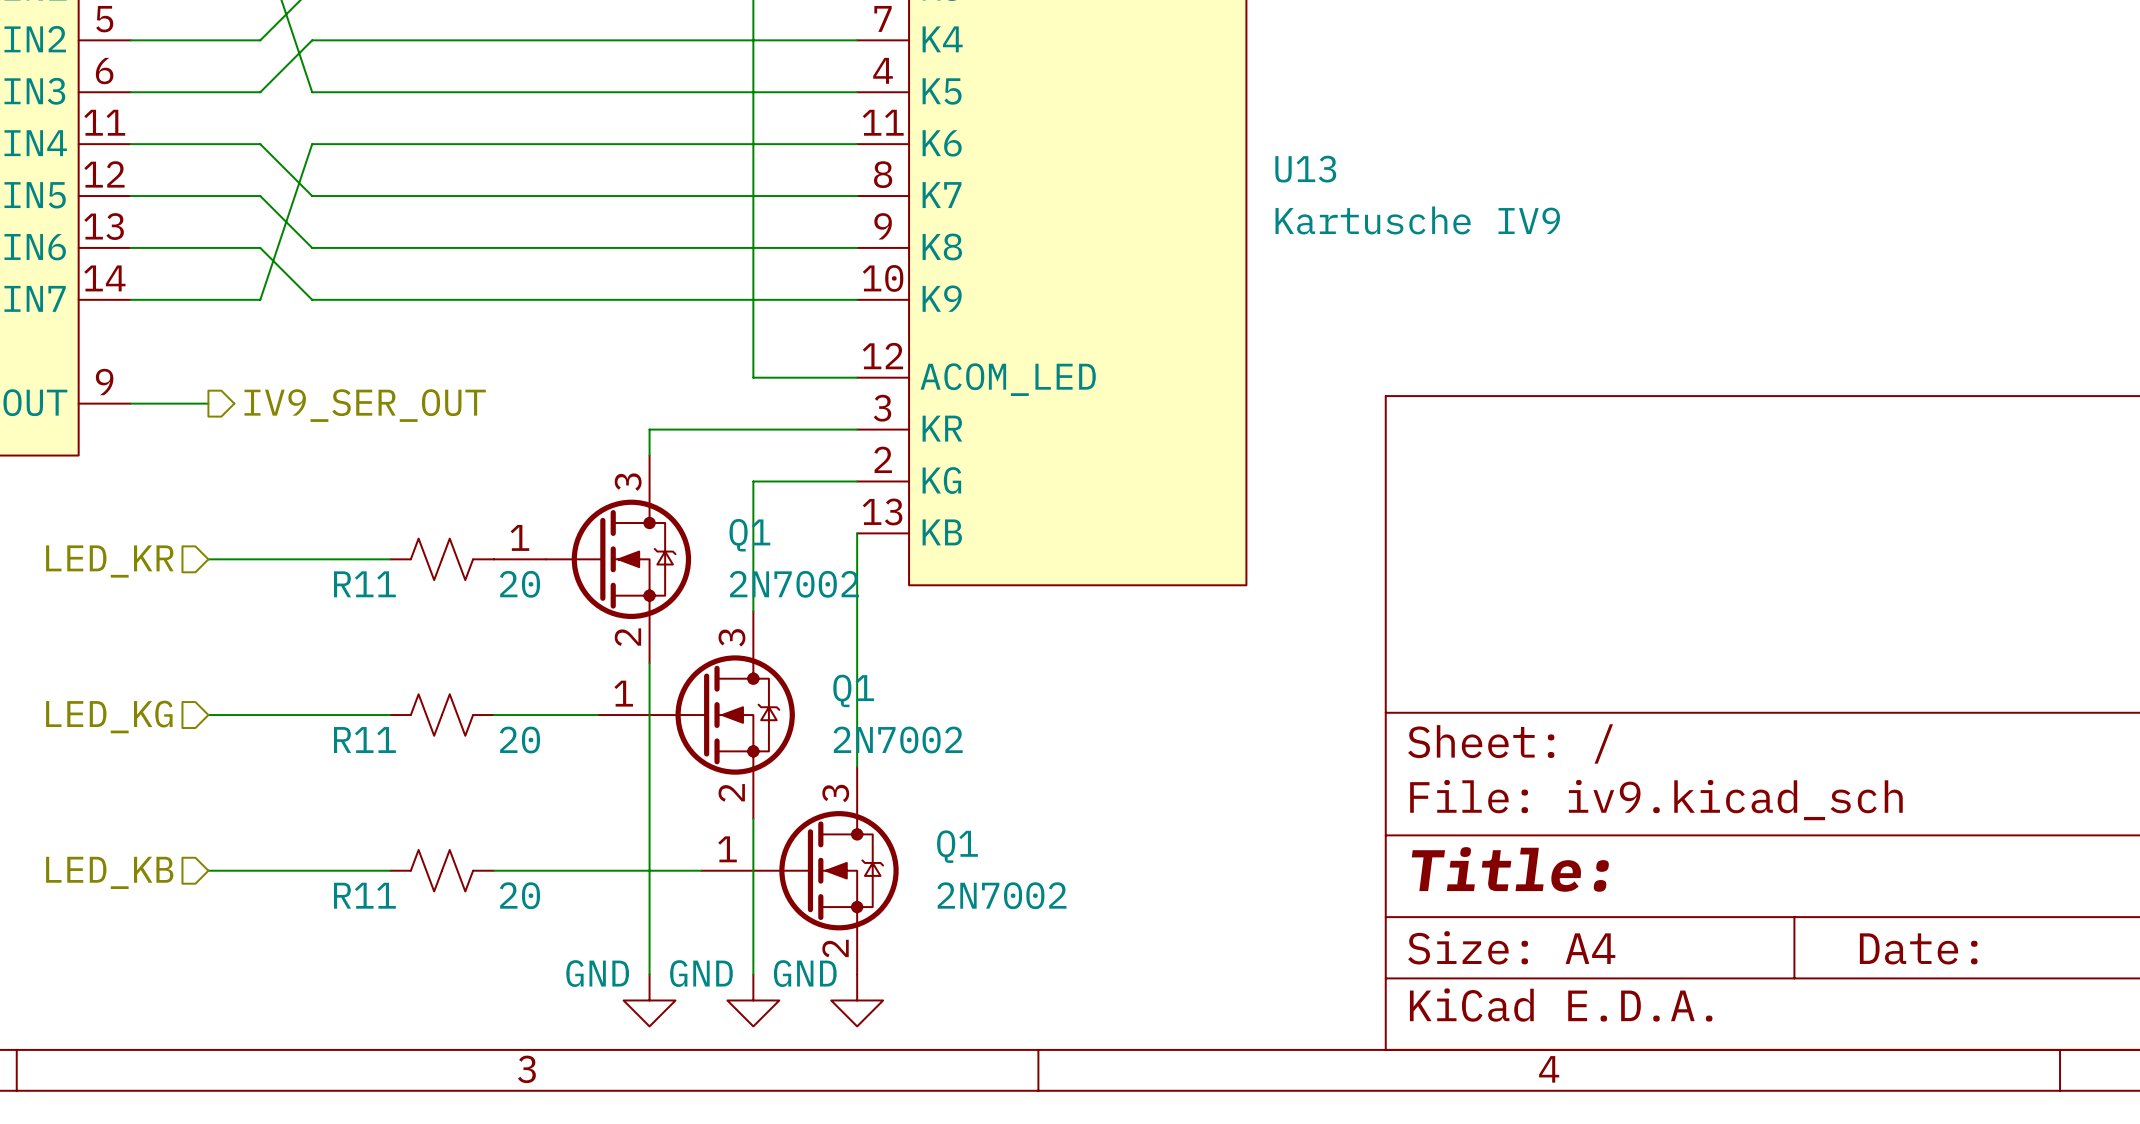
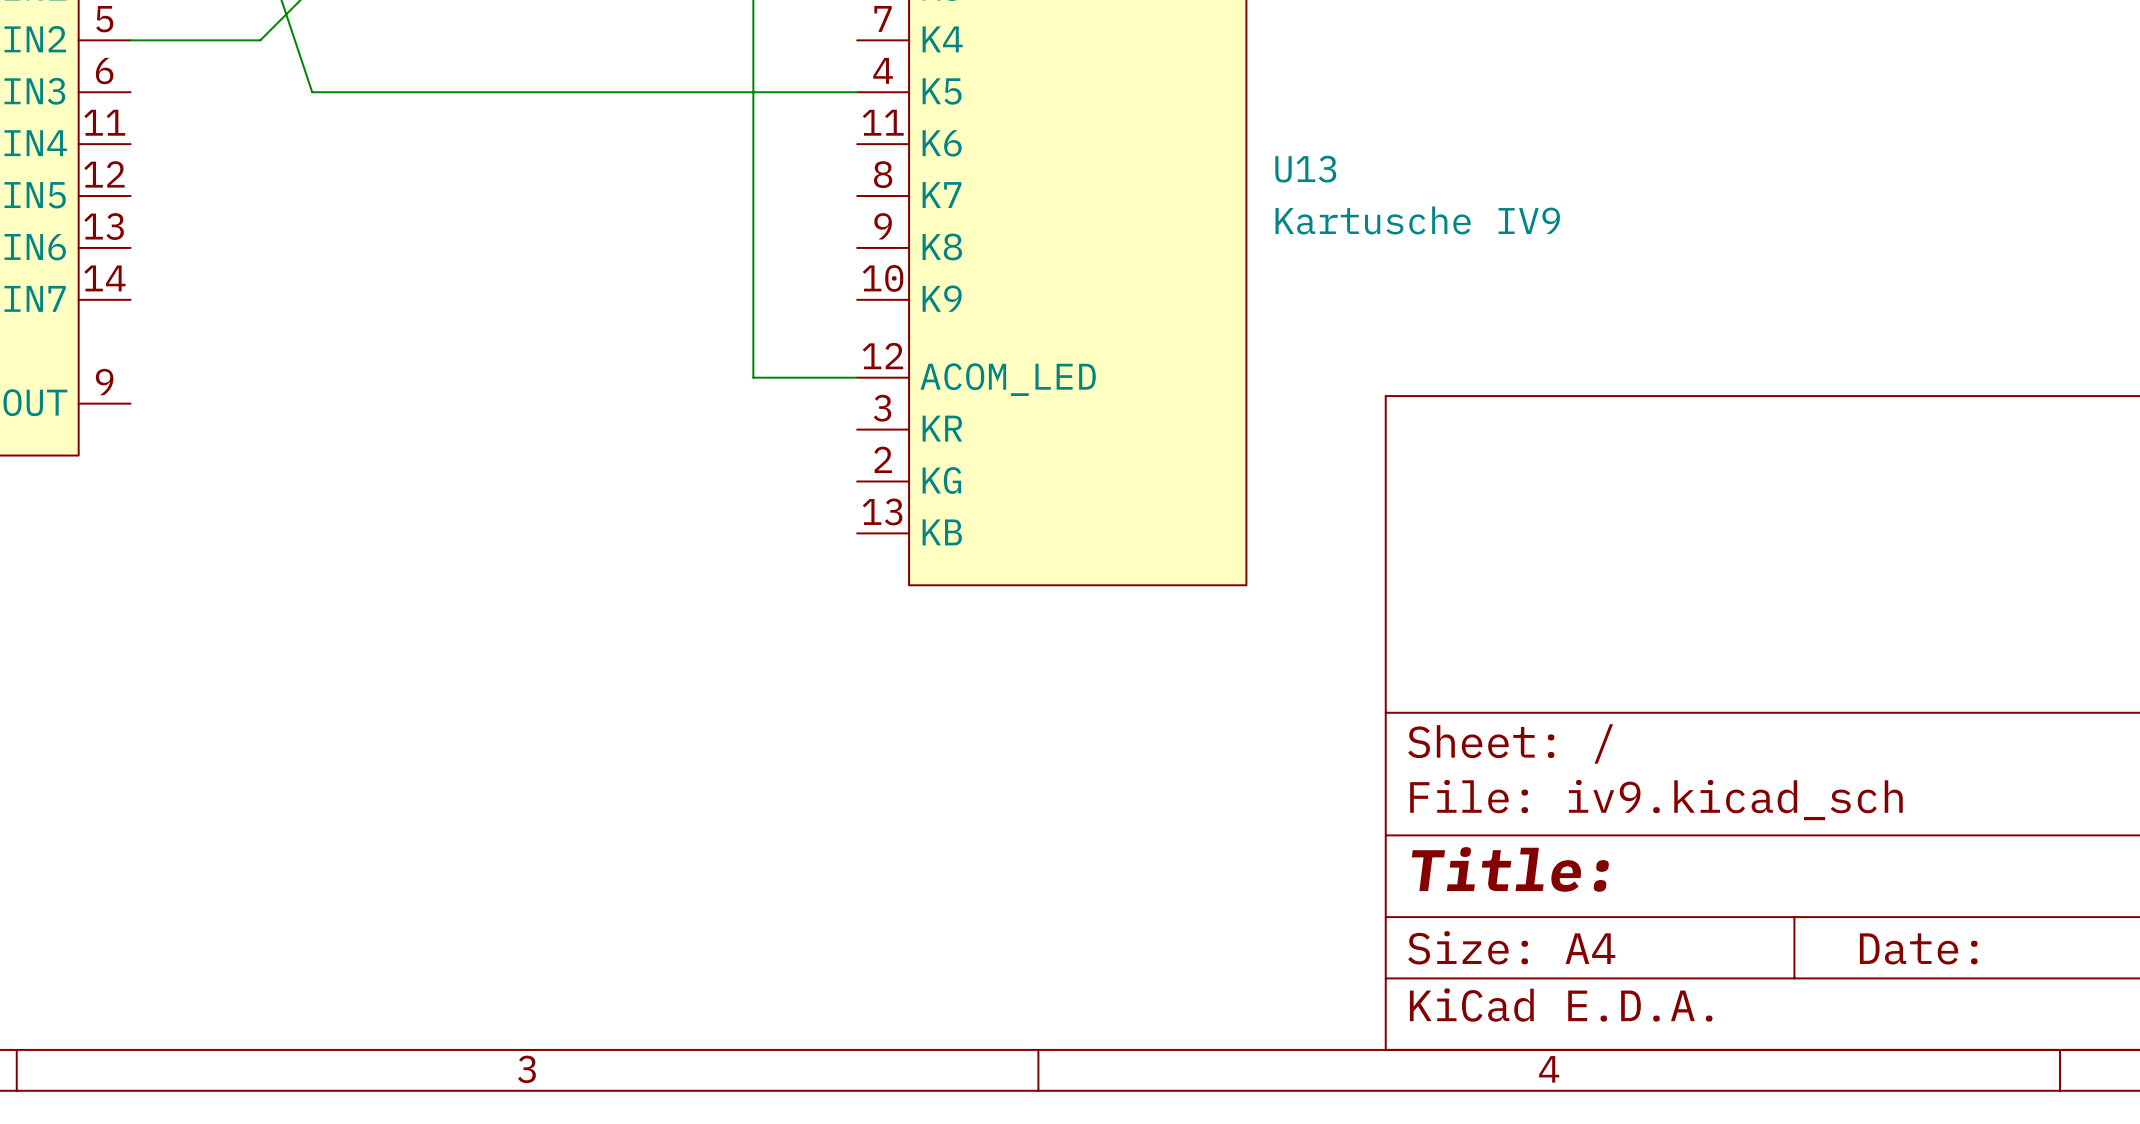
wire: (857, 40) (312, 40) (260, 92) (130, 92) -> none
wire: (130, 144) (260, 144) (312, 196) (857, 196) -> none
wire: (857, 144) (312, 144) (260, 299) (130, 299) -> none
wire: (130, 196) (260, 196) (312, 247) (857, 247) -> none
wire: (130, 247) (260, 247) (312, 299) (857, 299) -> none
wire: (130, 403) (208, 403) -> none
hierarchical label: IV9_SER_OUT (365, 405) -> none
wire: (857, 429) (649, 429) (649, 455) -> none
wire: (857, 481) (753, 481) (753, 611) -> none
wire: (857, 533) (857, 766) -> none
wire: (208, 559) (390, 559) -> none
R11: 20 (441, 559) -> none
Q1: 2N7002 (592, 559) -> none
hierarchical label: LED_KR (109, 561) -> none
wire: (649, 663) (649, 974) -> none
wire: (208, 715) (390, 715) -> none
R11: 20 (441, 715) -> none
wire: (493, 715) (597, 715) -> none
Q1: 2N7002 (696, 715) -> none
hierarchical label: LED_KG (109, 716) -> none
wire: (753, 818) (753, 974) -> none
wire: (208, 870) (390, 870) -> none
R11: 20 (441, 870) -> none
wire: (493, 870) (701, 870) -> none
Q1: 2N7002 (800, 870) -> none
hierarchical label: LED_KB (109, 872) -> none
power symbol: GND (649, 1000) -> none
power symbol: GND (753, 1000) -> none
power symbol: GND (857, 1000) -> none

